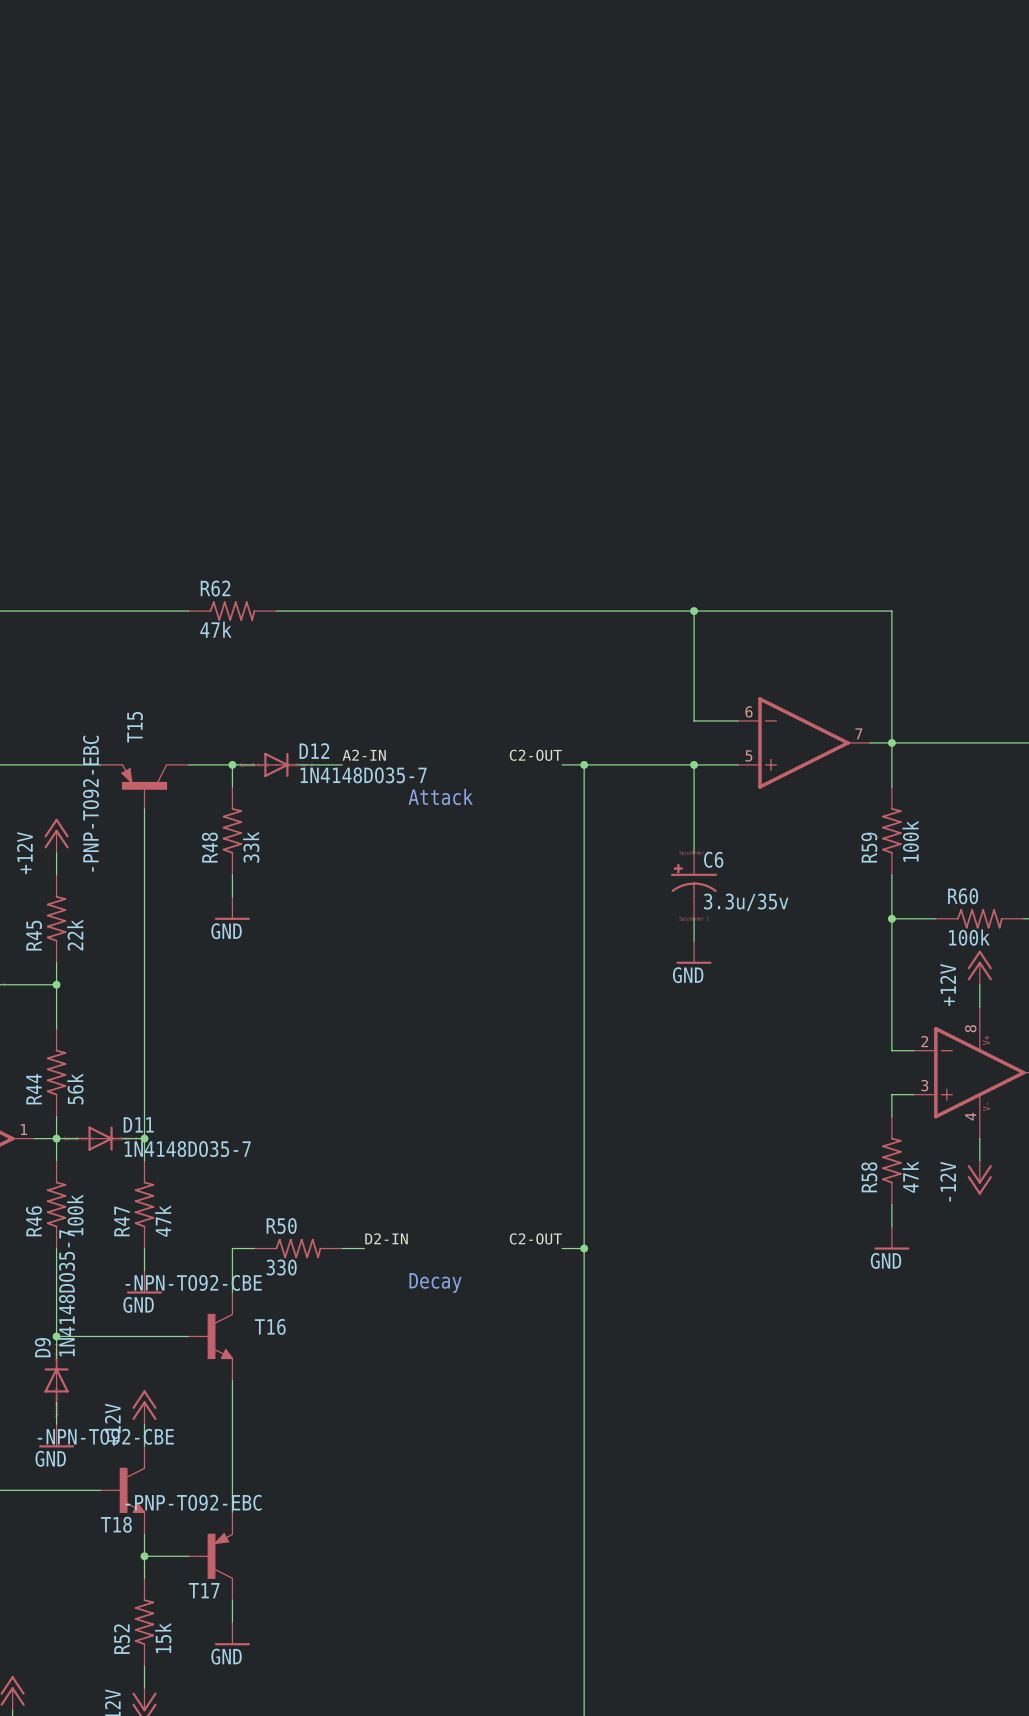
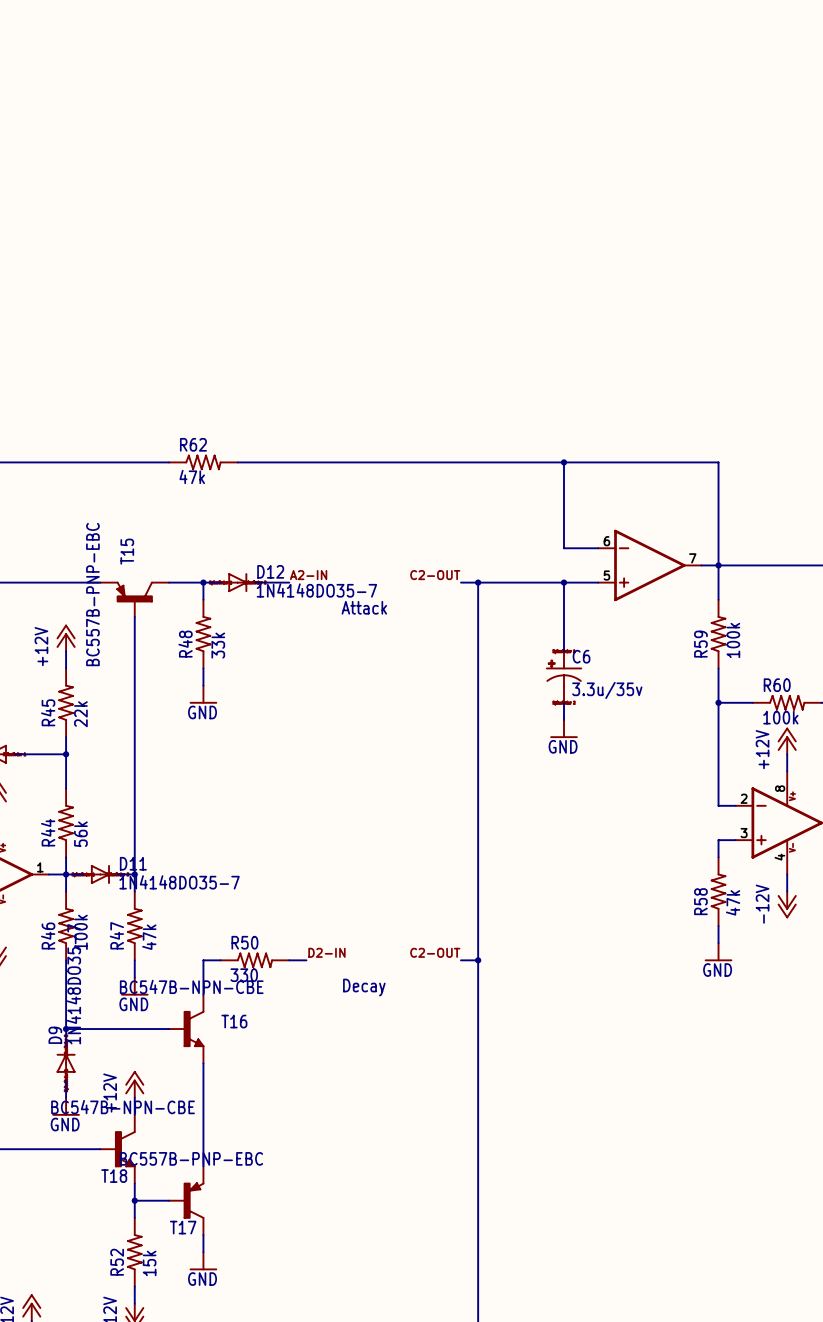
T15 value: -PNP-TO92-EBC (90, 803) -> BC557B-PNP-EBC (92, 594)
T16 value: -NPN-TO92-CBE (193, 1282) -> BC547B-NPN-CBE (191, 986)
T18 value: -NPN-TO92-CBE (105, 1436) -> BC547B-NPN-CBE (123, 1107)
T17 value: -PNP-TO92-EBC (193, 1502) -> BC557B-PNP-EBC (191, 1158)

